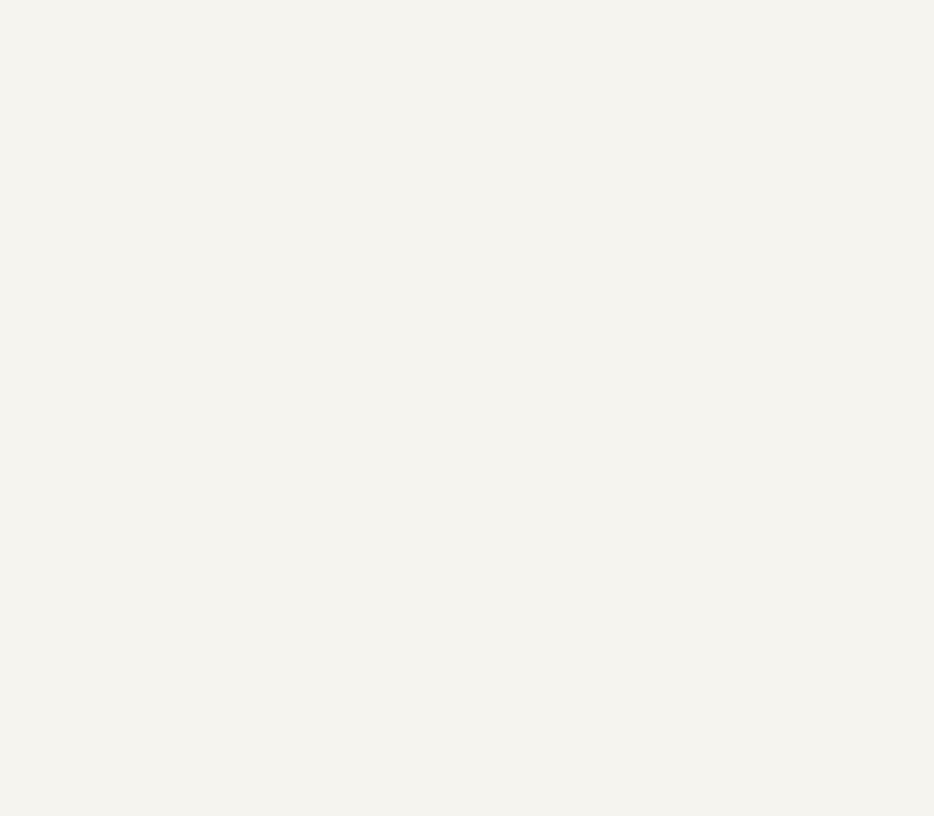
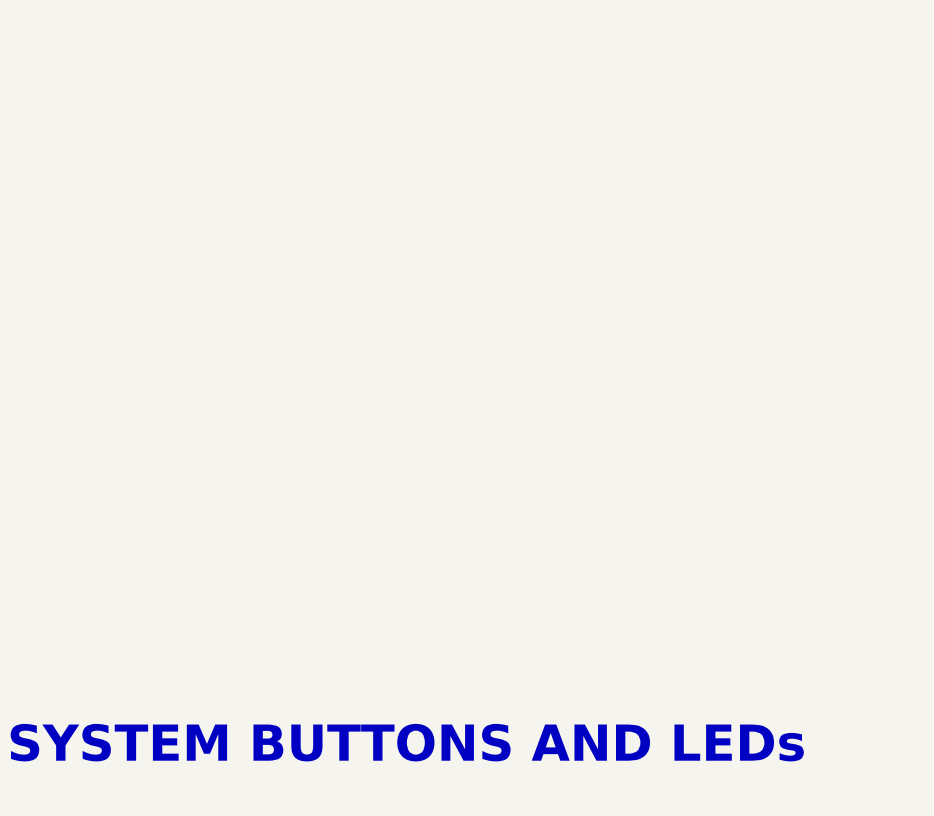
text: none -> SYSTEM BUTTONS AND LEDs (407, 742)

